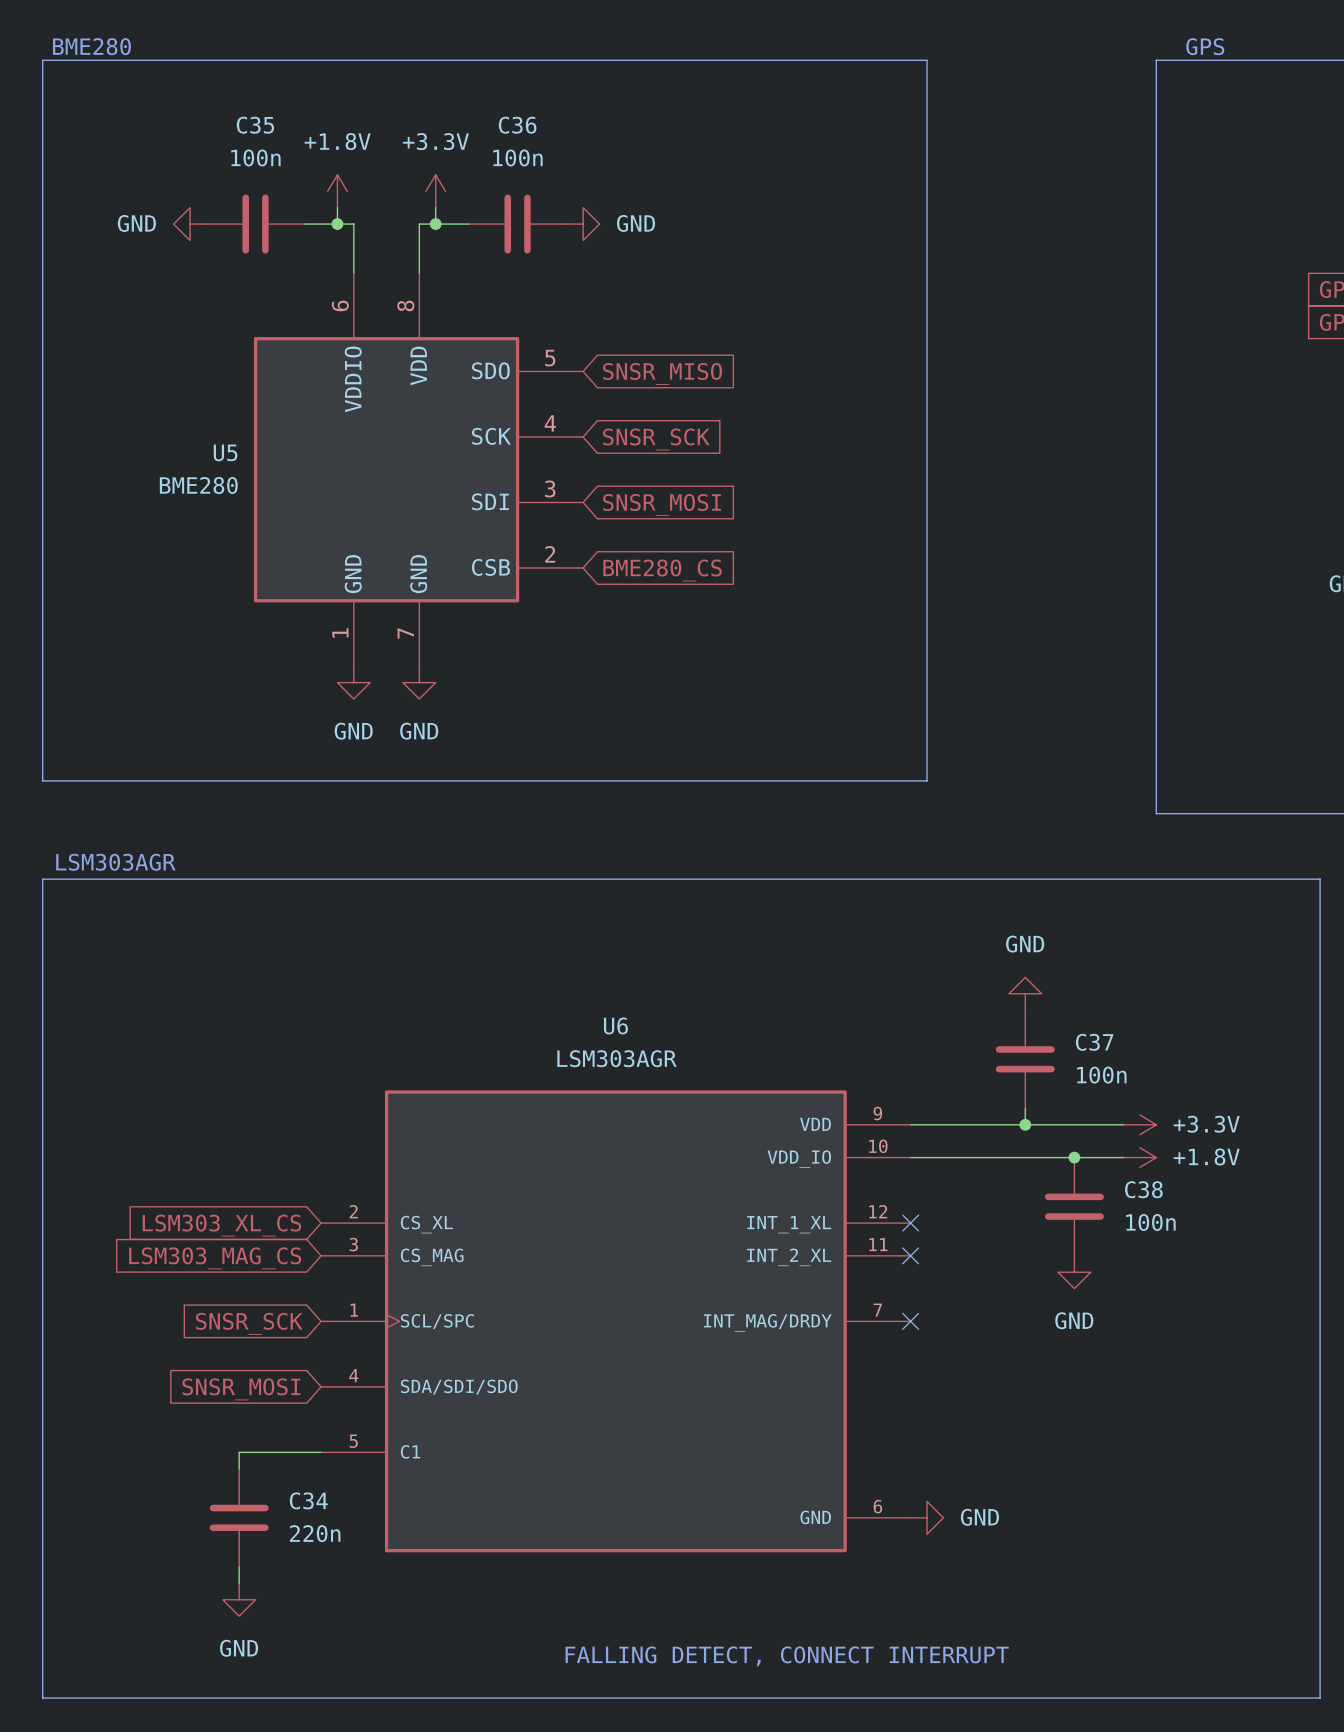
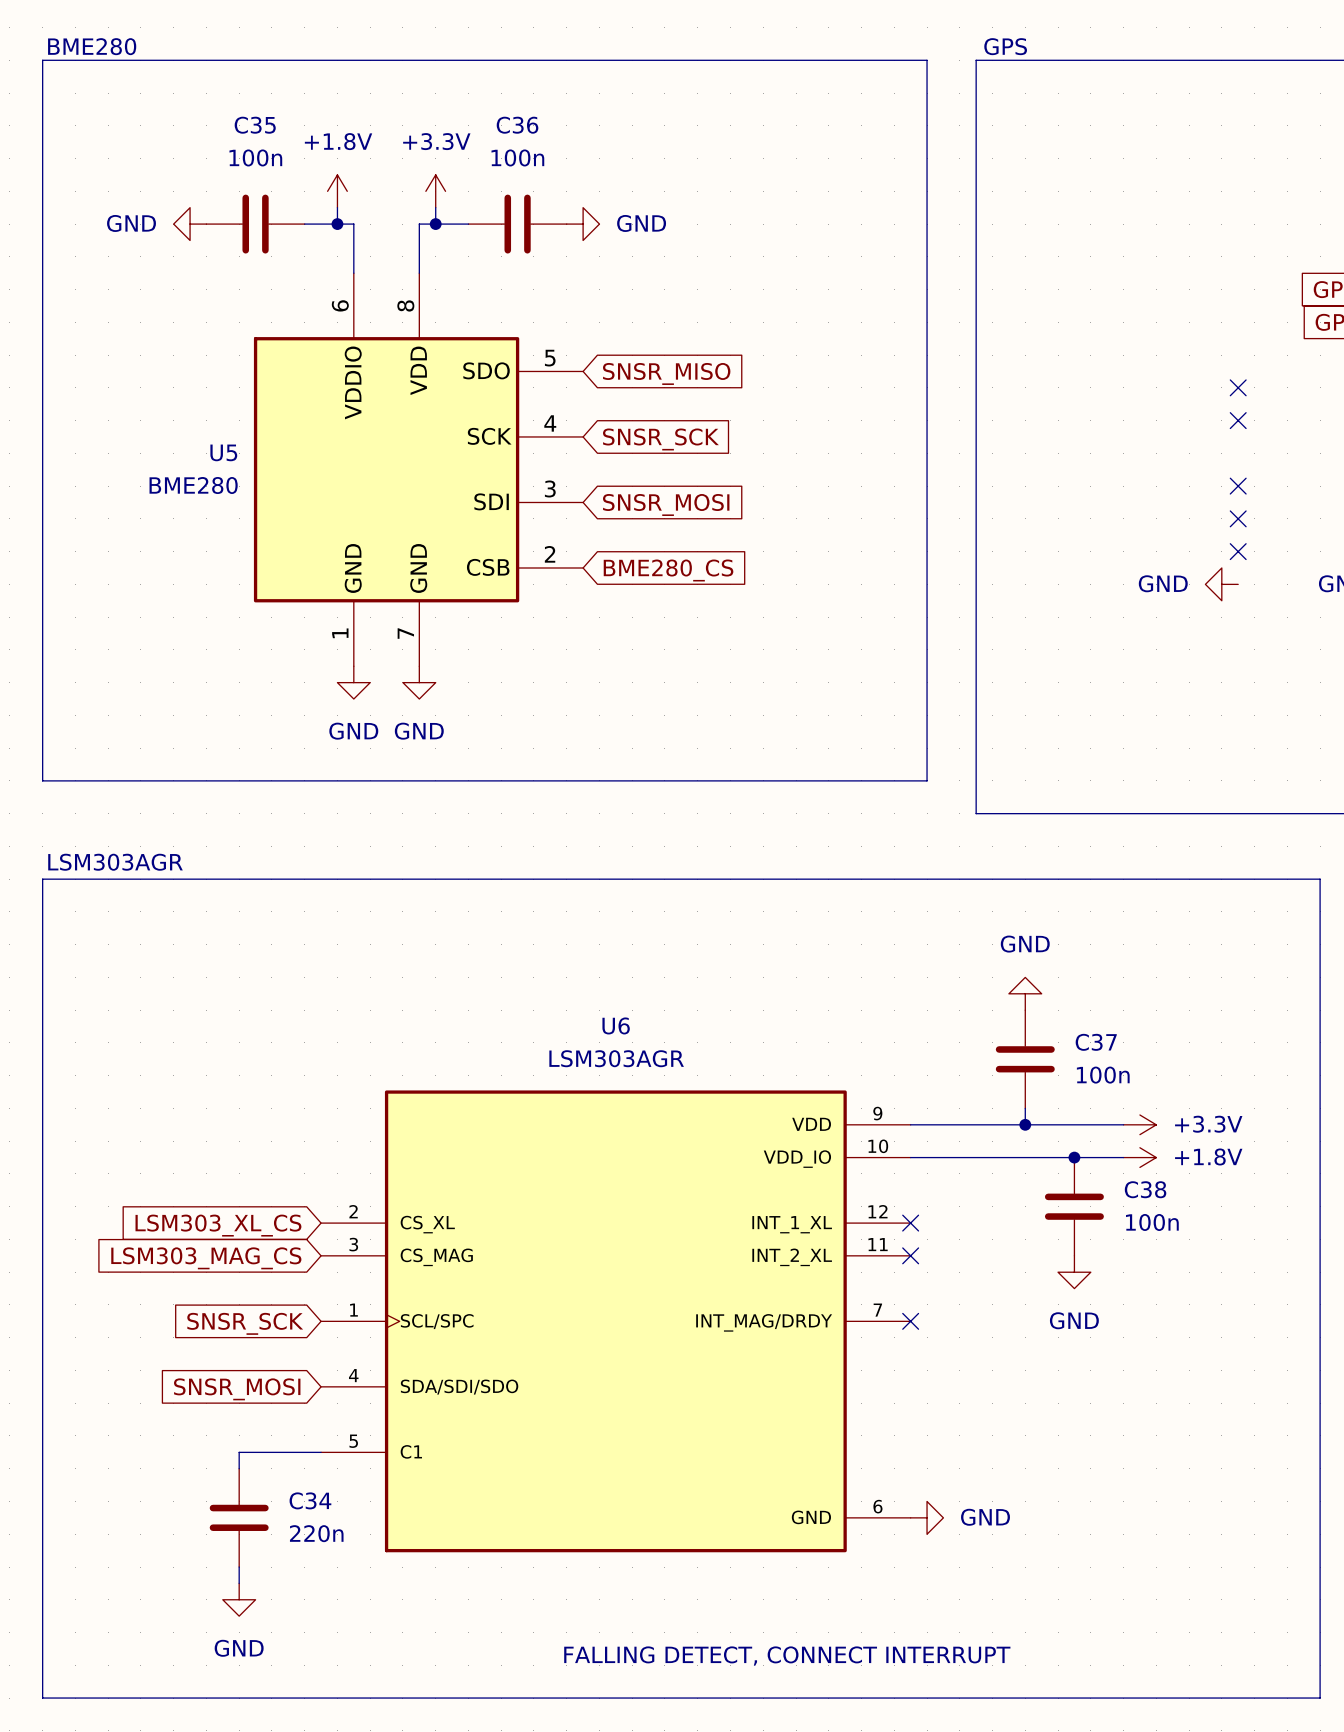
text position: GPS (1205, 46) -> GPS (1005, 46)
line: (1156, 60) (1156, 813) -> (1156, 60) (976, 60) (976, 813) (1156, 813)
no-connect mark: none -> (1238, 387)
no-connect mark: none -> (1238, 420)
no-connect mark: none -> (1238, 486)
no-connect mark: none -> (1238, 518)
no-connect mark: none -> (1238, 551)
power symbol: none -> GND (1221, 584)

